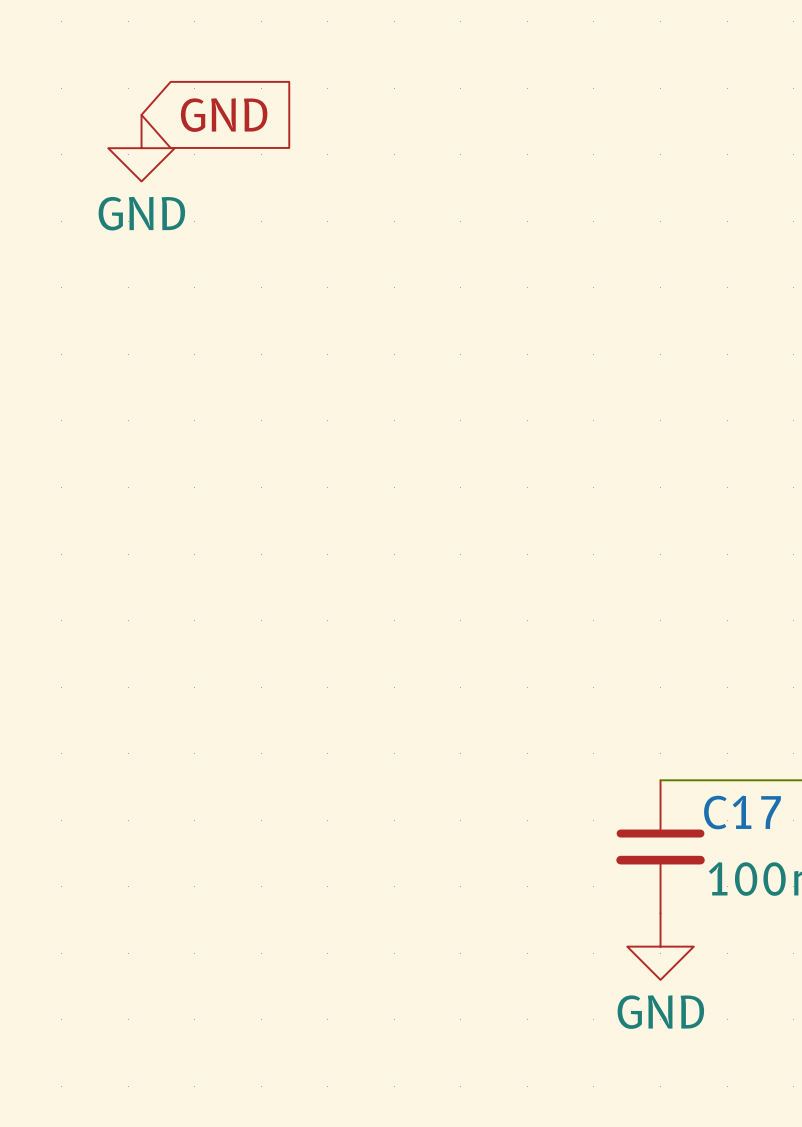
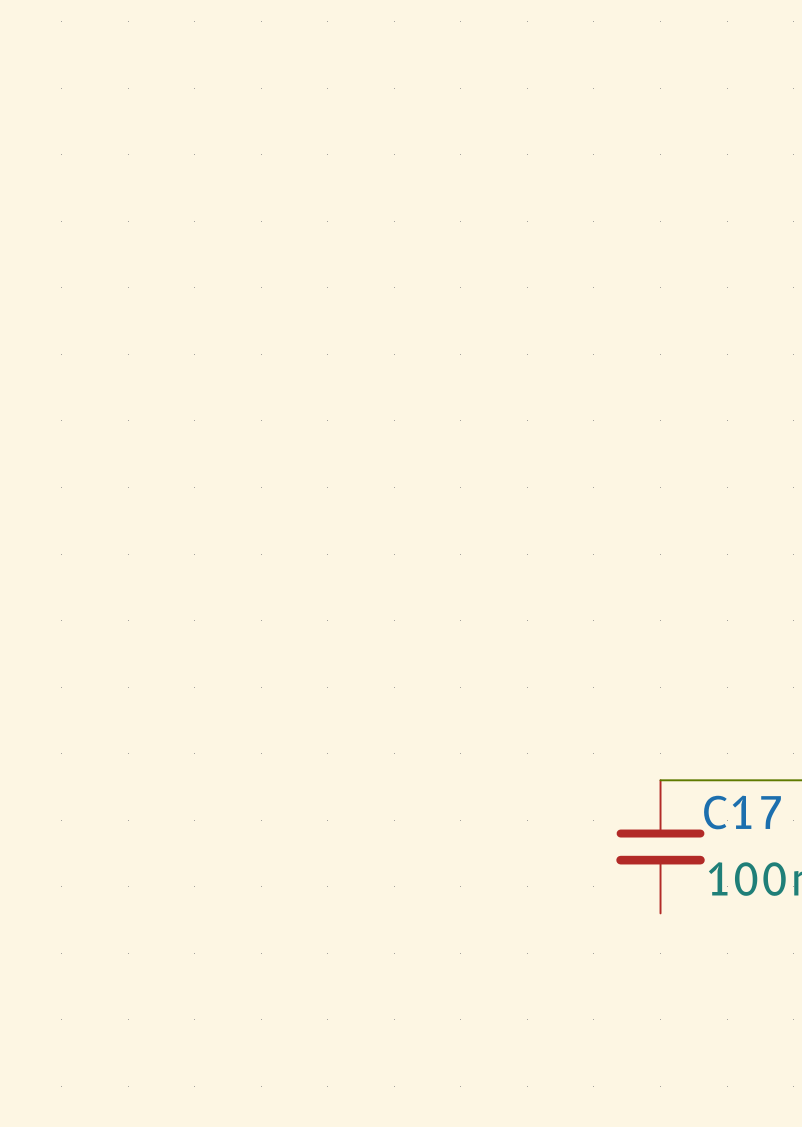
global label: GND (224, 115) -> none
power symbol: GND (141, 148) -> none
power symbol: GND (660, 946) -> none

